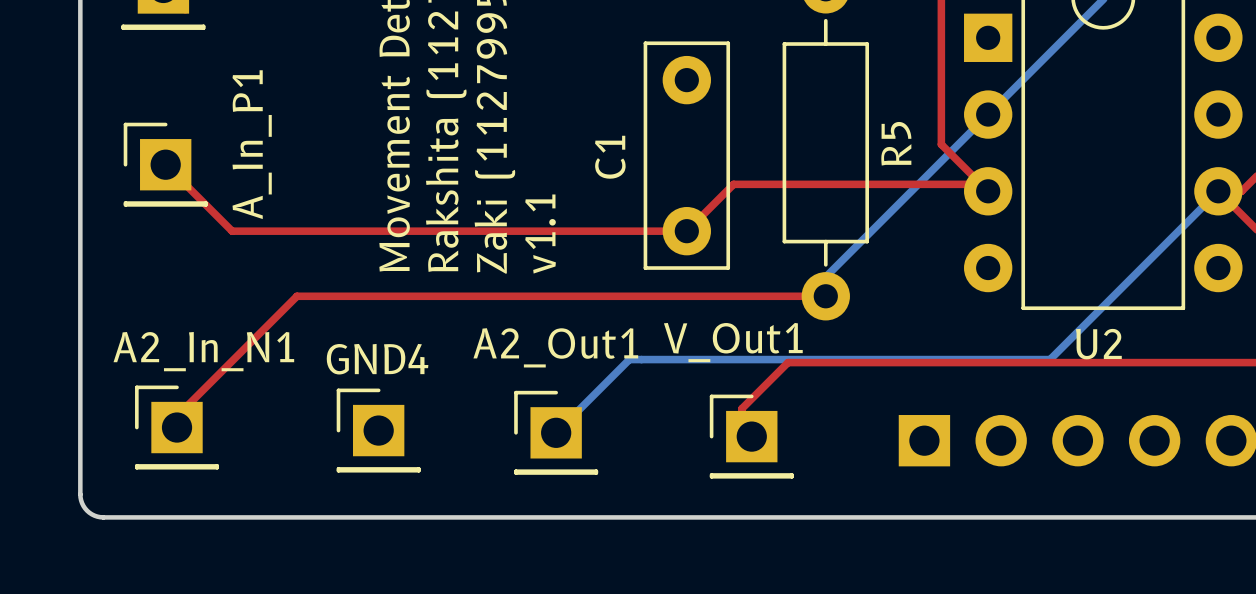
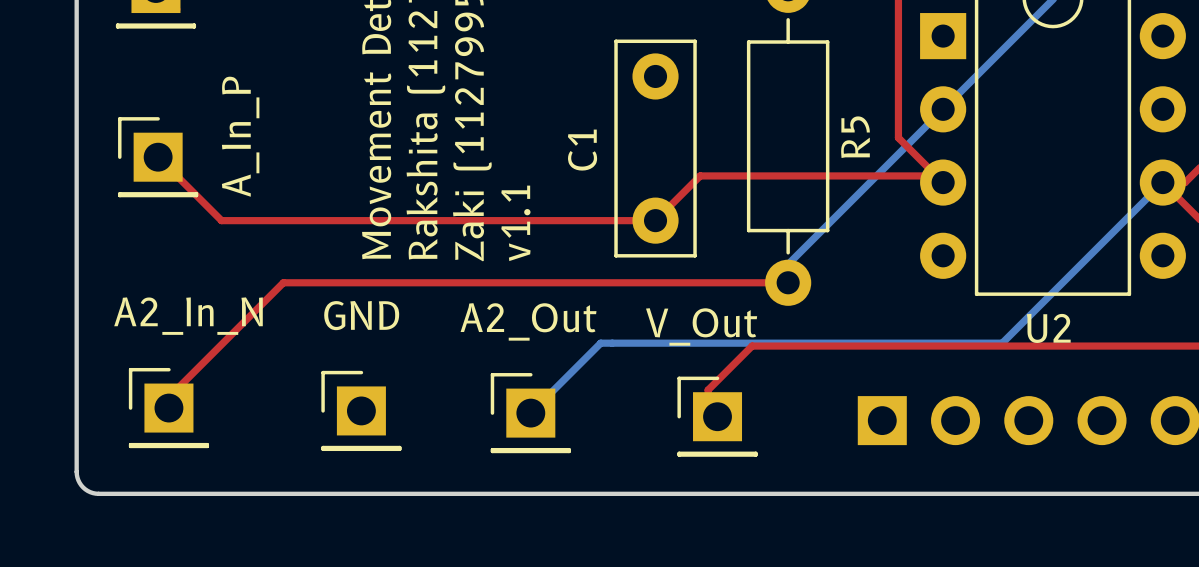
A_In_P1 name: A_In_P1 (252, 144) -> A_In_P (240, 136)
V_Out1 name: V_Out1 (733, 342) -> V_Out (701, 326)
A2_Out1 name: A2_Out1 (555, 347) -> A2_Out (528, 321)
A2_In_N1 name: A2_In_N1 (203, 351) -> A2_In_N (188, 316)
GND4 name: GND4 (377, 359) -> GND (361, 315)

